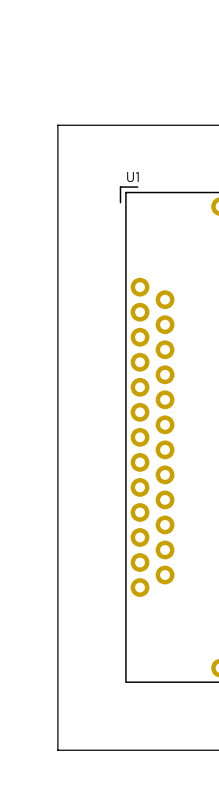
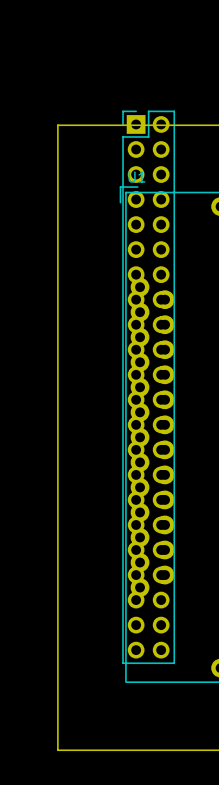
part: none -> (148, 387)

